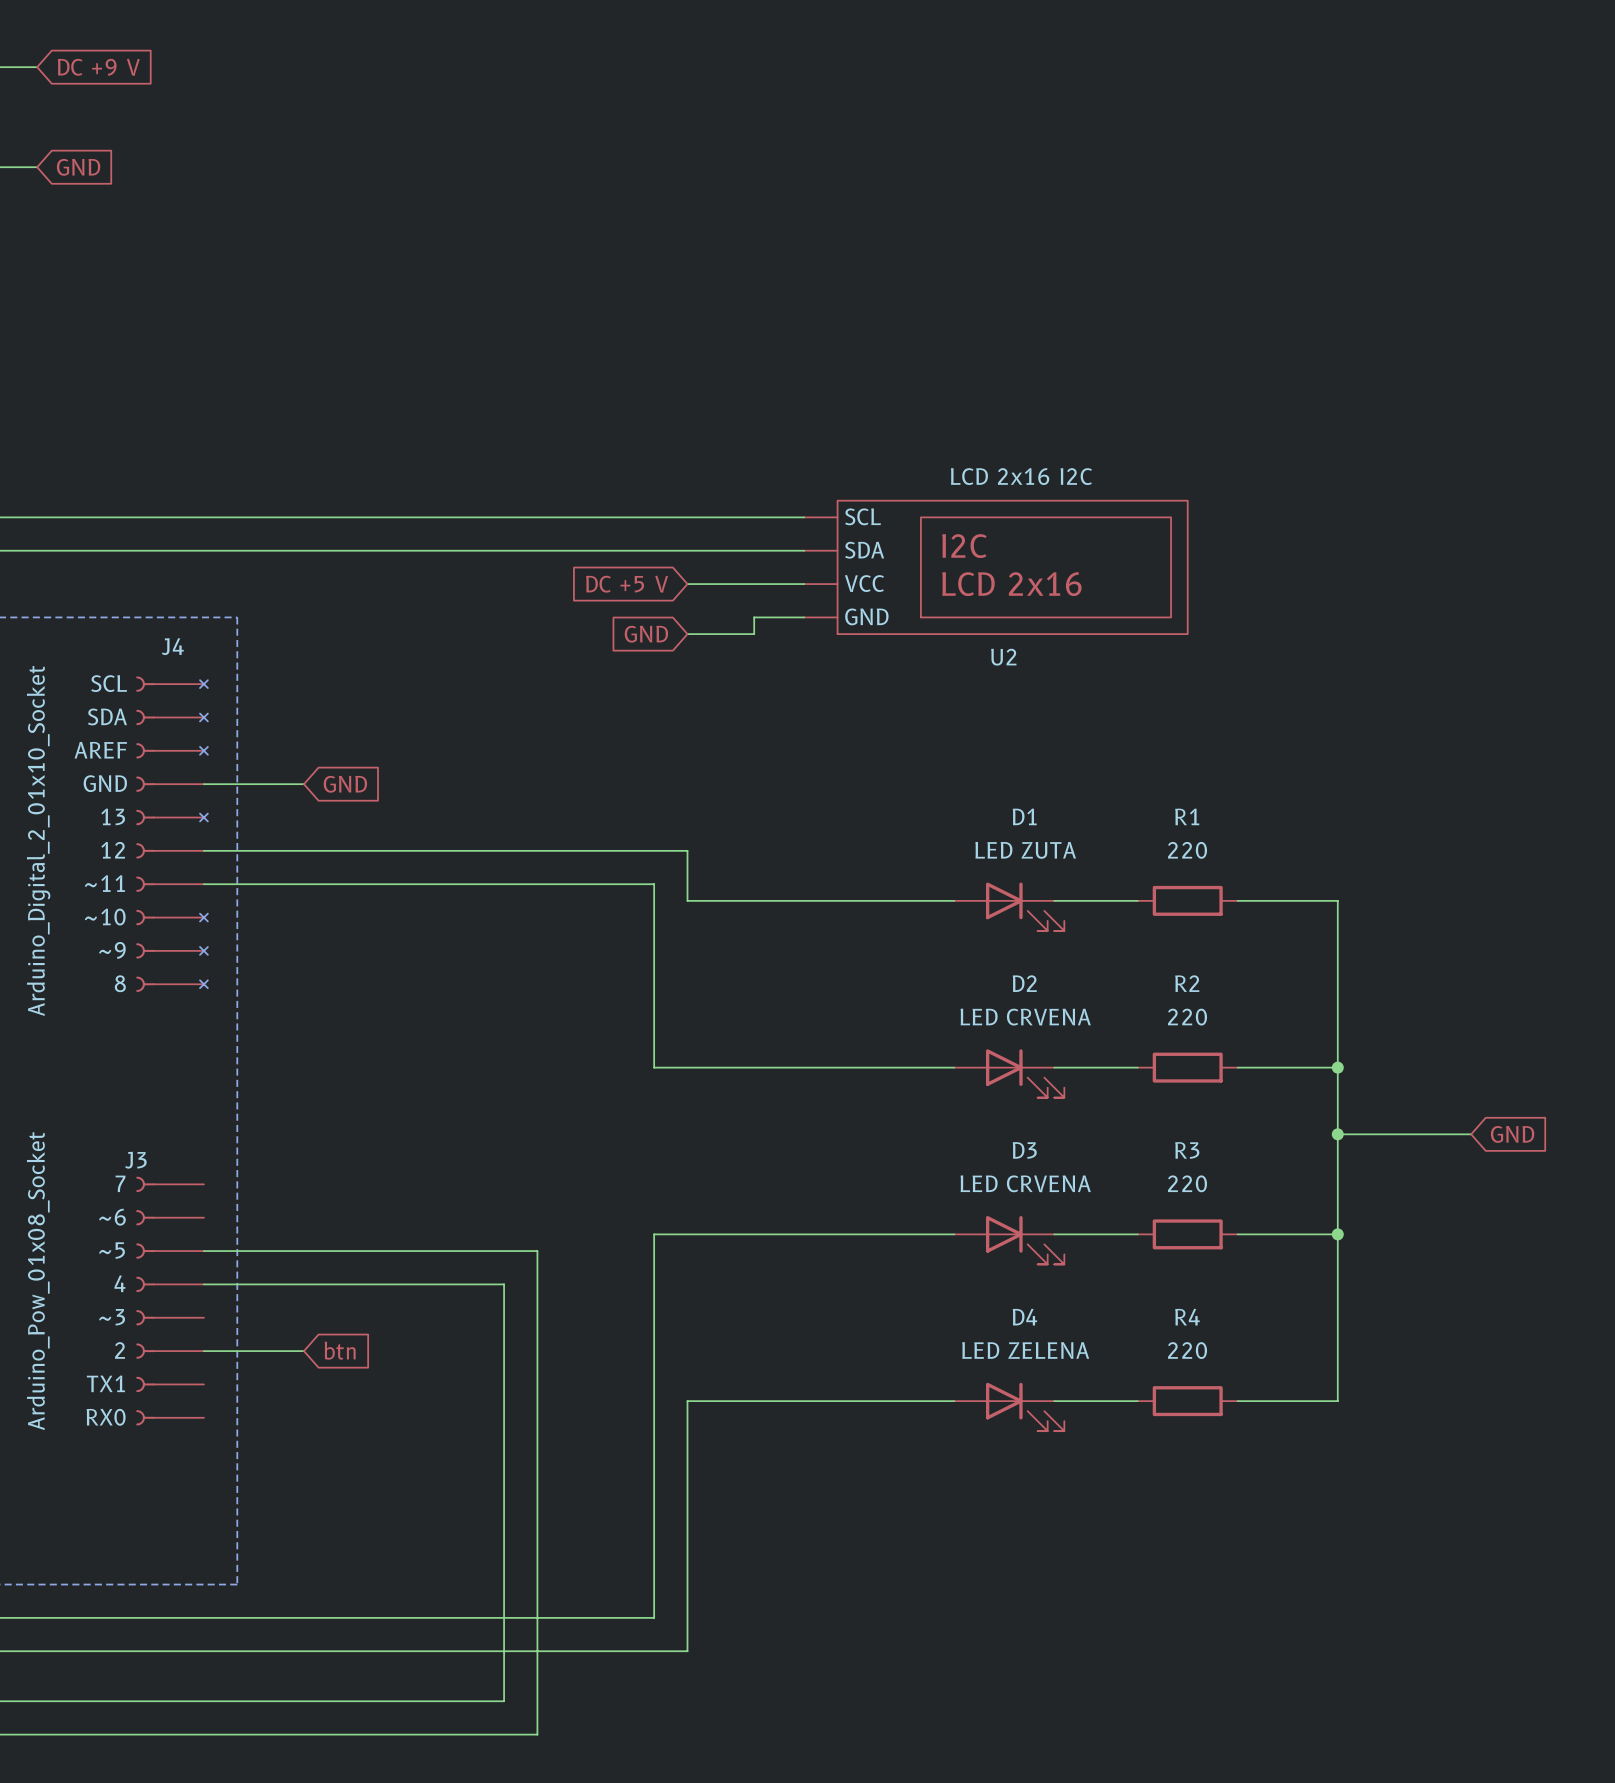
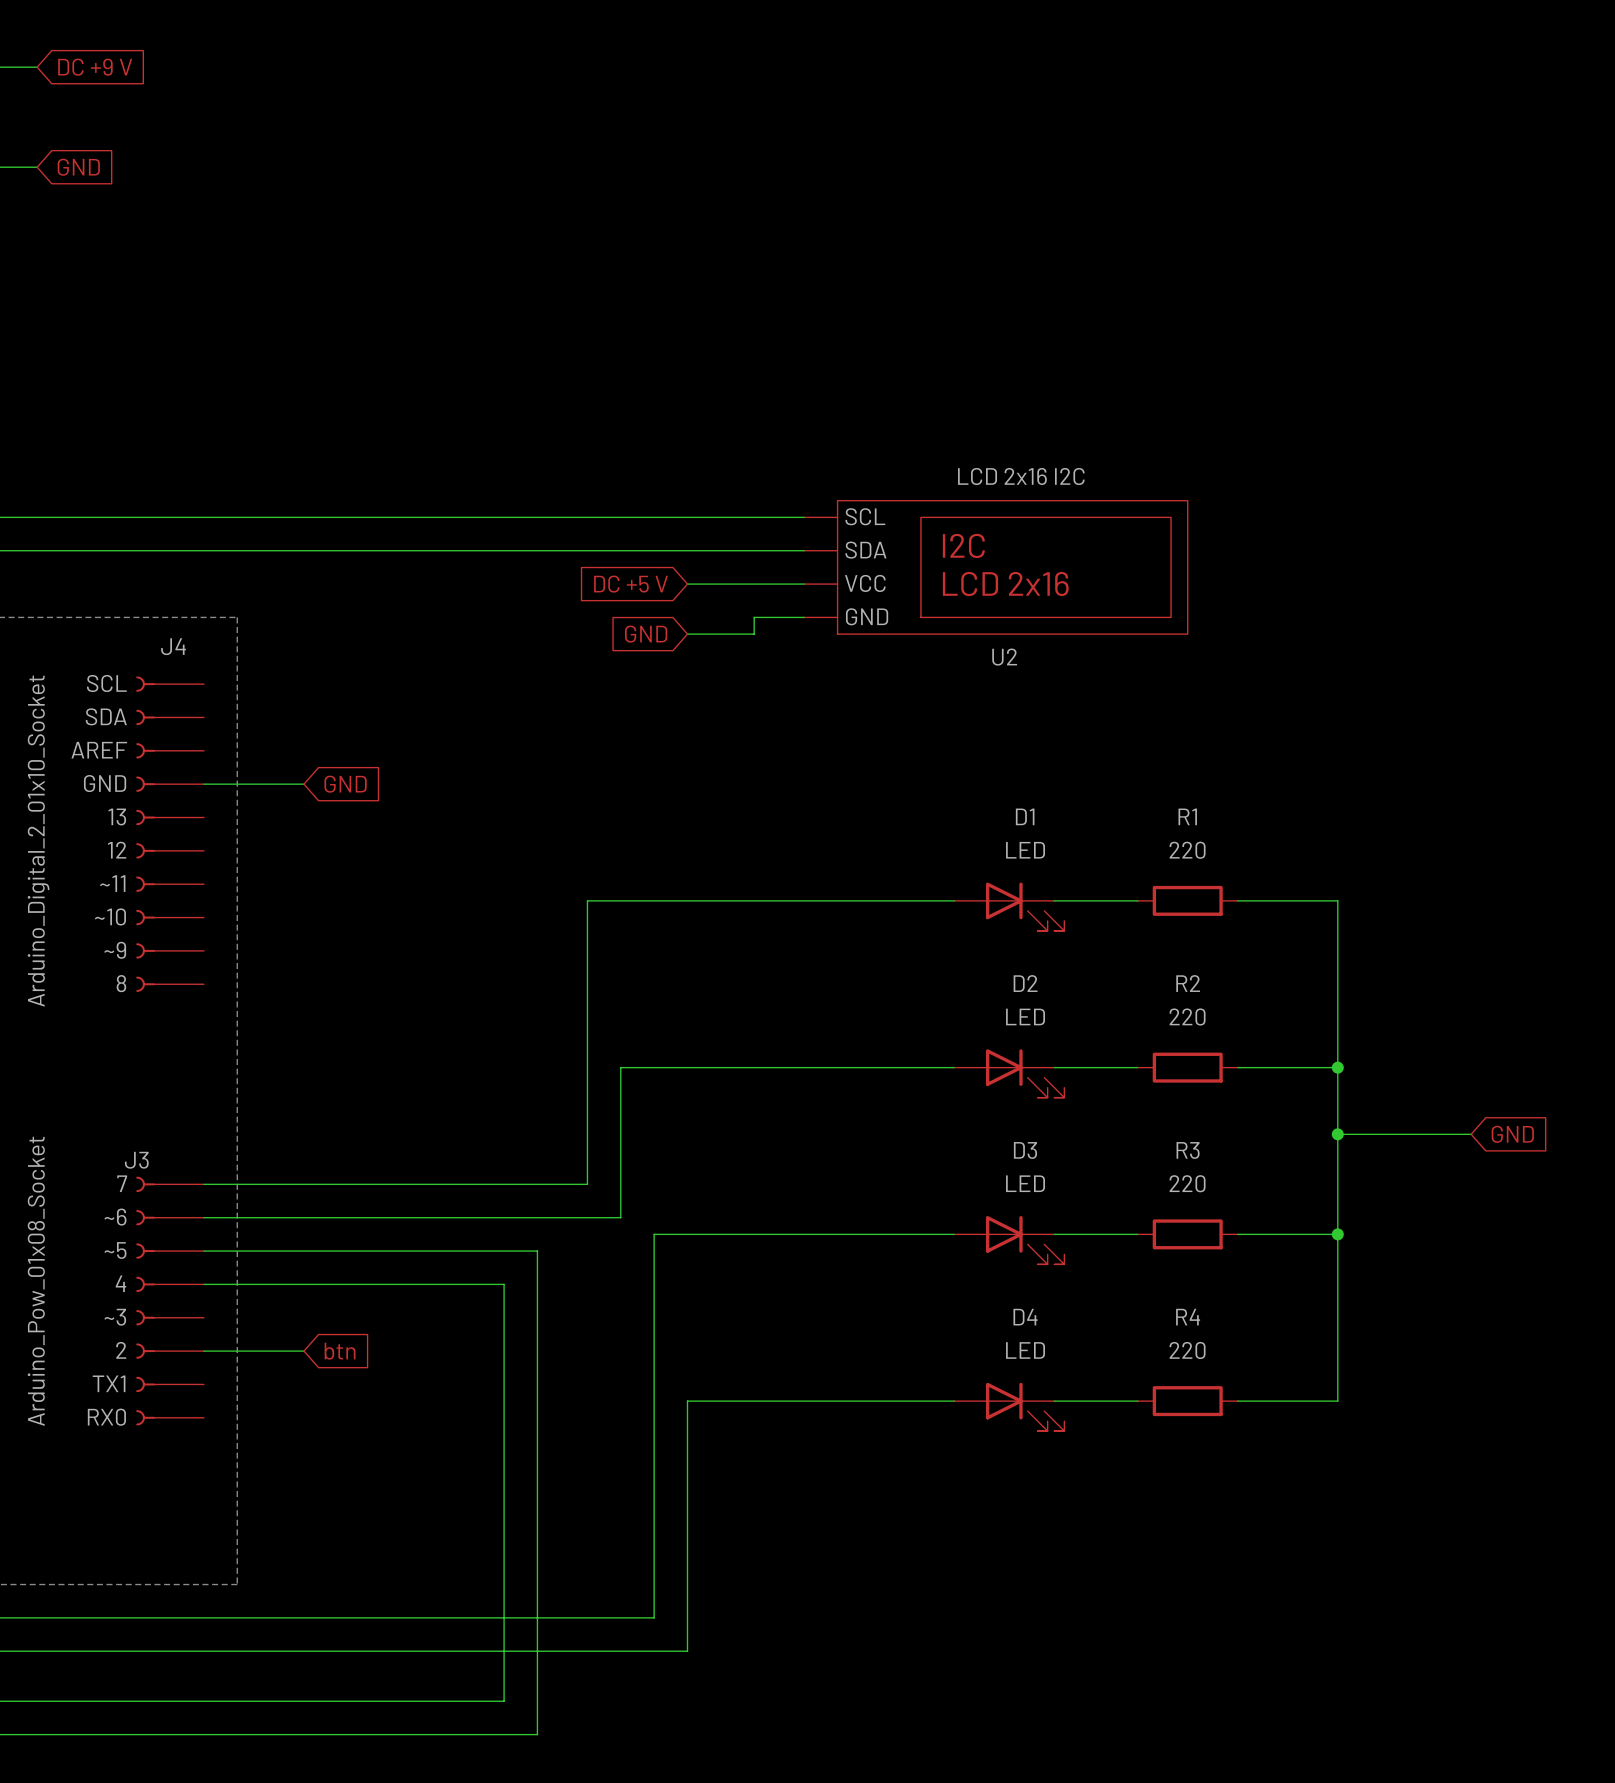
J4 symbol: [136, 676, 208, 992] -> [136, 676, 204, 992]
wire: (203, 850) (687, 850) (687, 900) -> (203, 1184) (587, 1184) (587, 900) (687, 900)
D1 value: LED ZUTA (1025, 850) -> LED (1025, 850)
wire: (203, 884) (654, 884) (654, 1067) -> (203, 1217) (620, 1217) (620, 1067) (654, 1067)
D2 value: LED CRVENA (1025, 1017) -> LED (1025, 1016)
D3 value: LED CRVENA (1025, 1183) -> LED (1025, 1183)
D4 value: LED ZELENA (1025, 1350) -> LED (1025, 1350)

